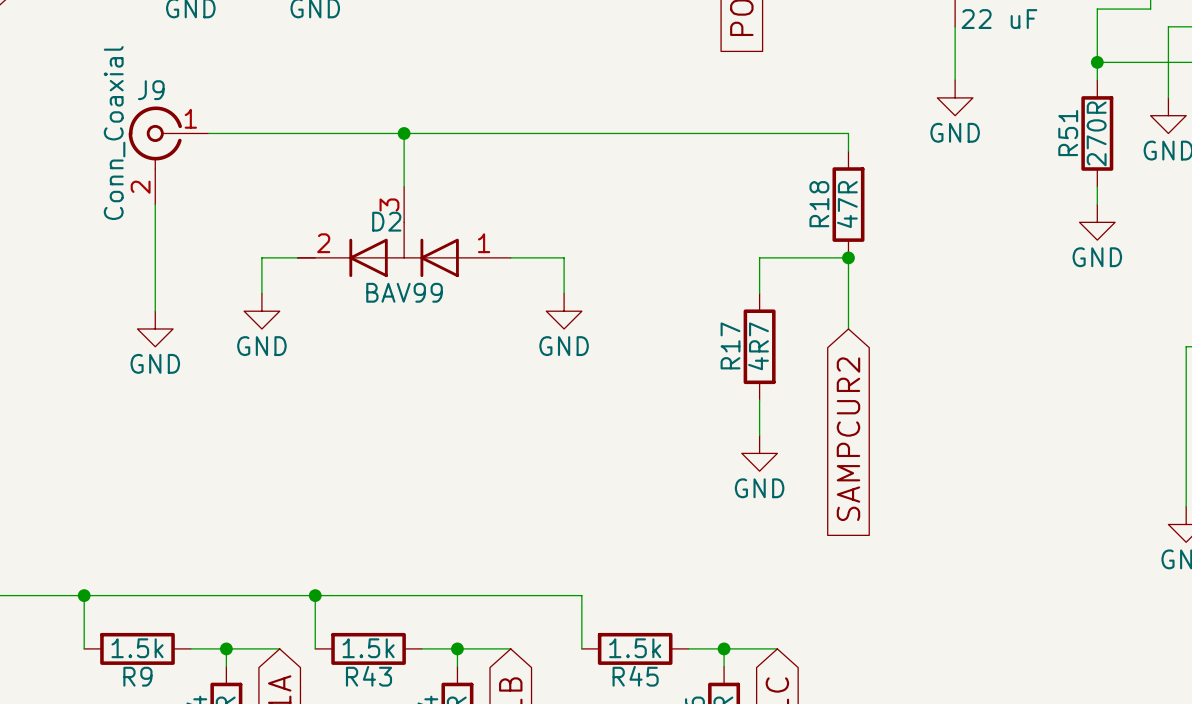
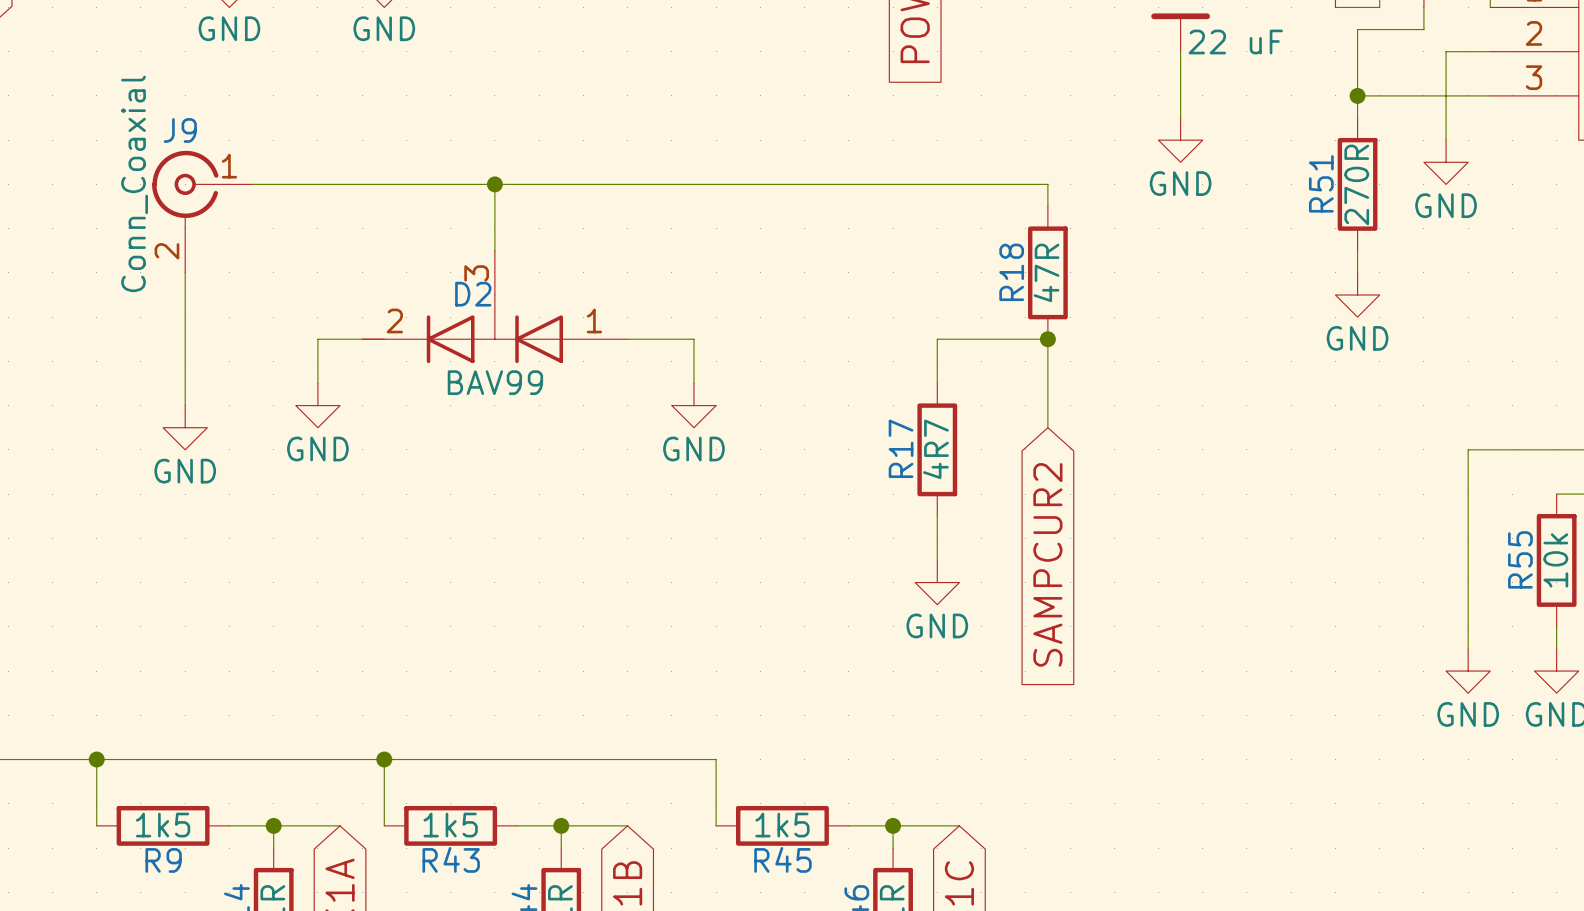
R9 value: 1.5k (137, 648) -> 1k5 (163, 825)
R43 value: 1.5k (368, 648) -> 1k5 (450, 825)
R45 value: 1.5k (635, 648) -> 1k5 (782, 825)

